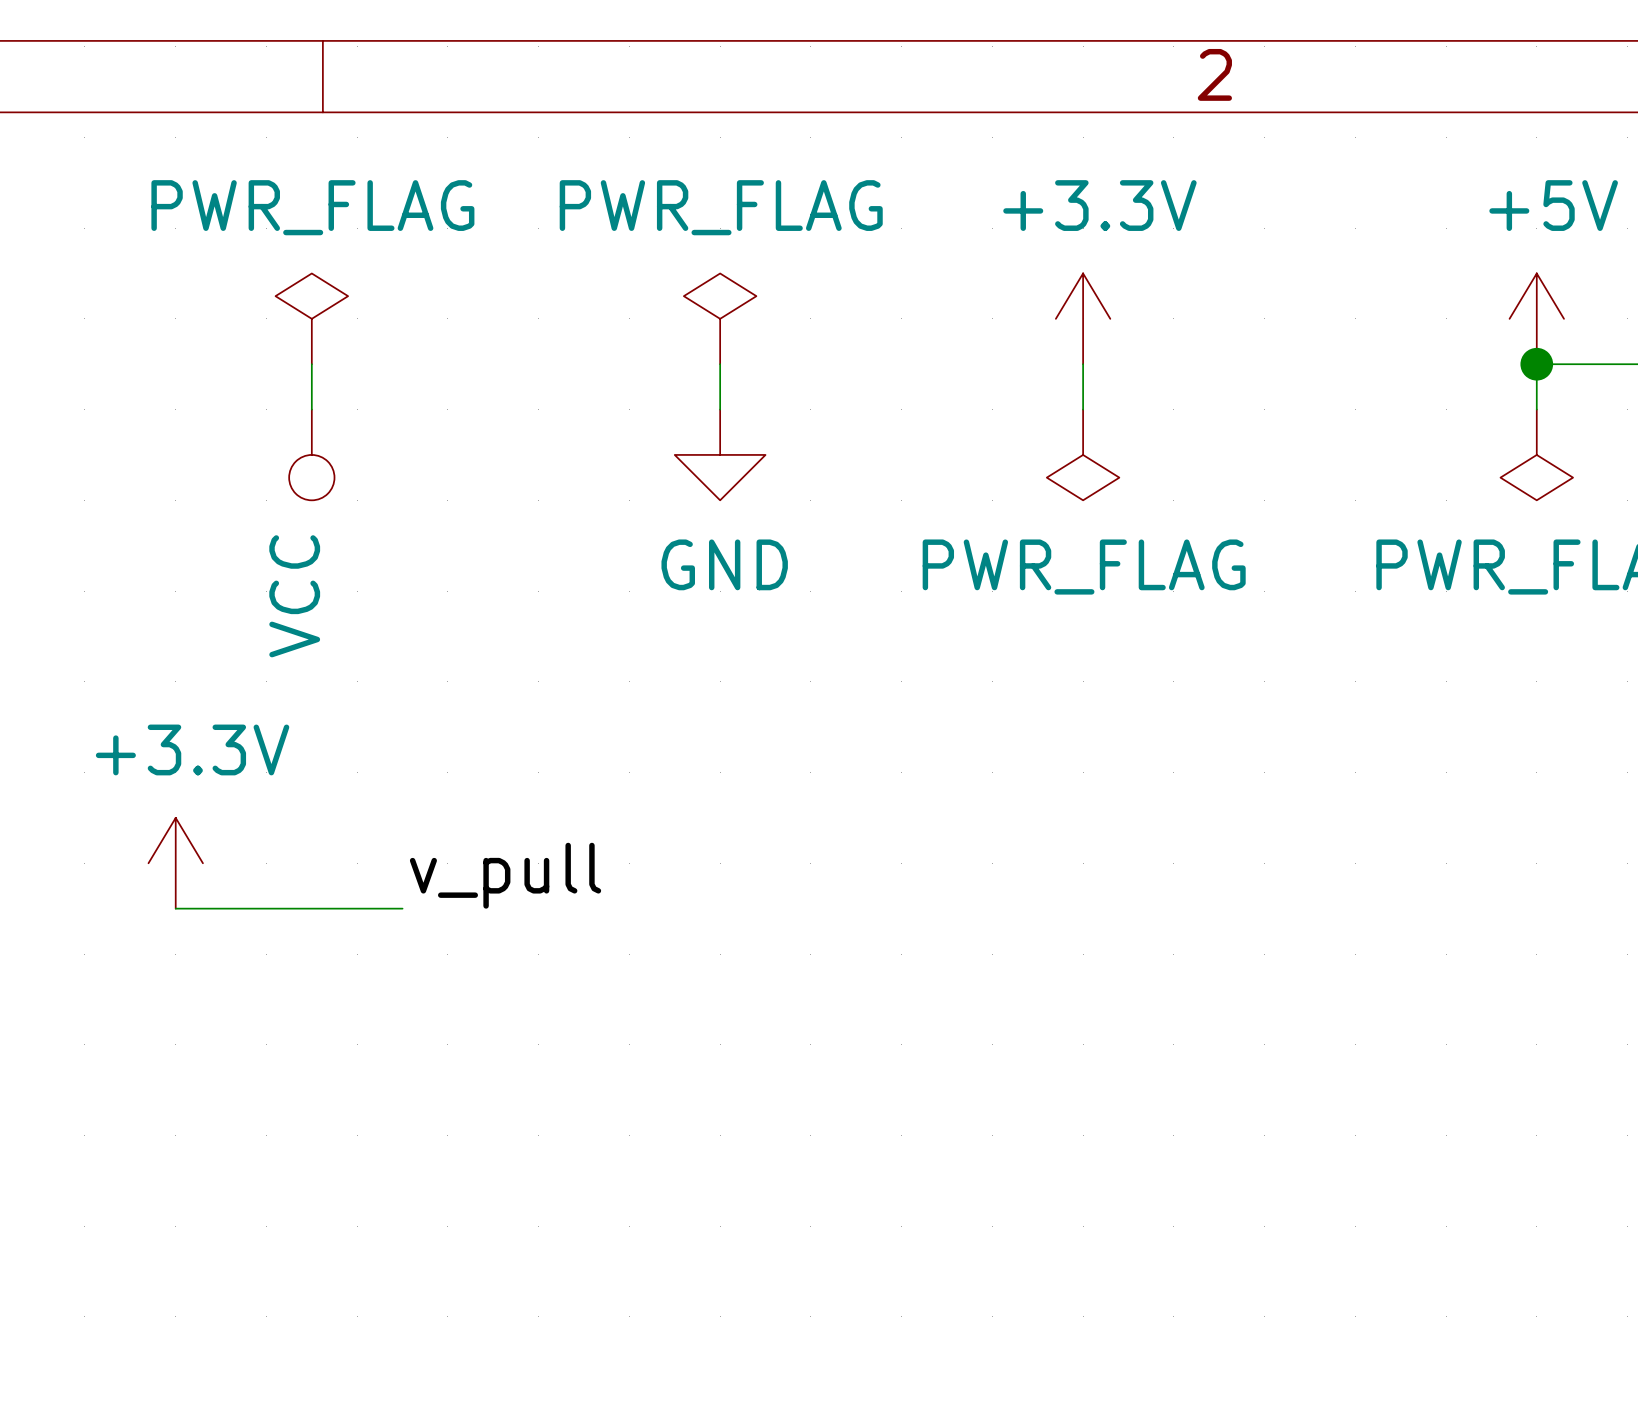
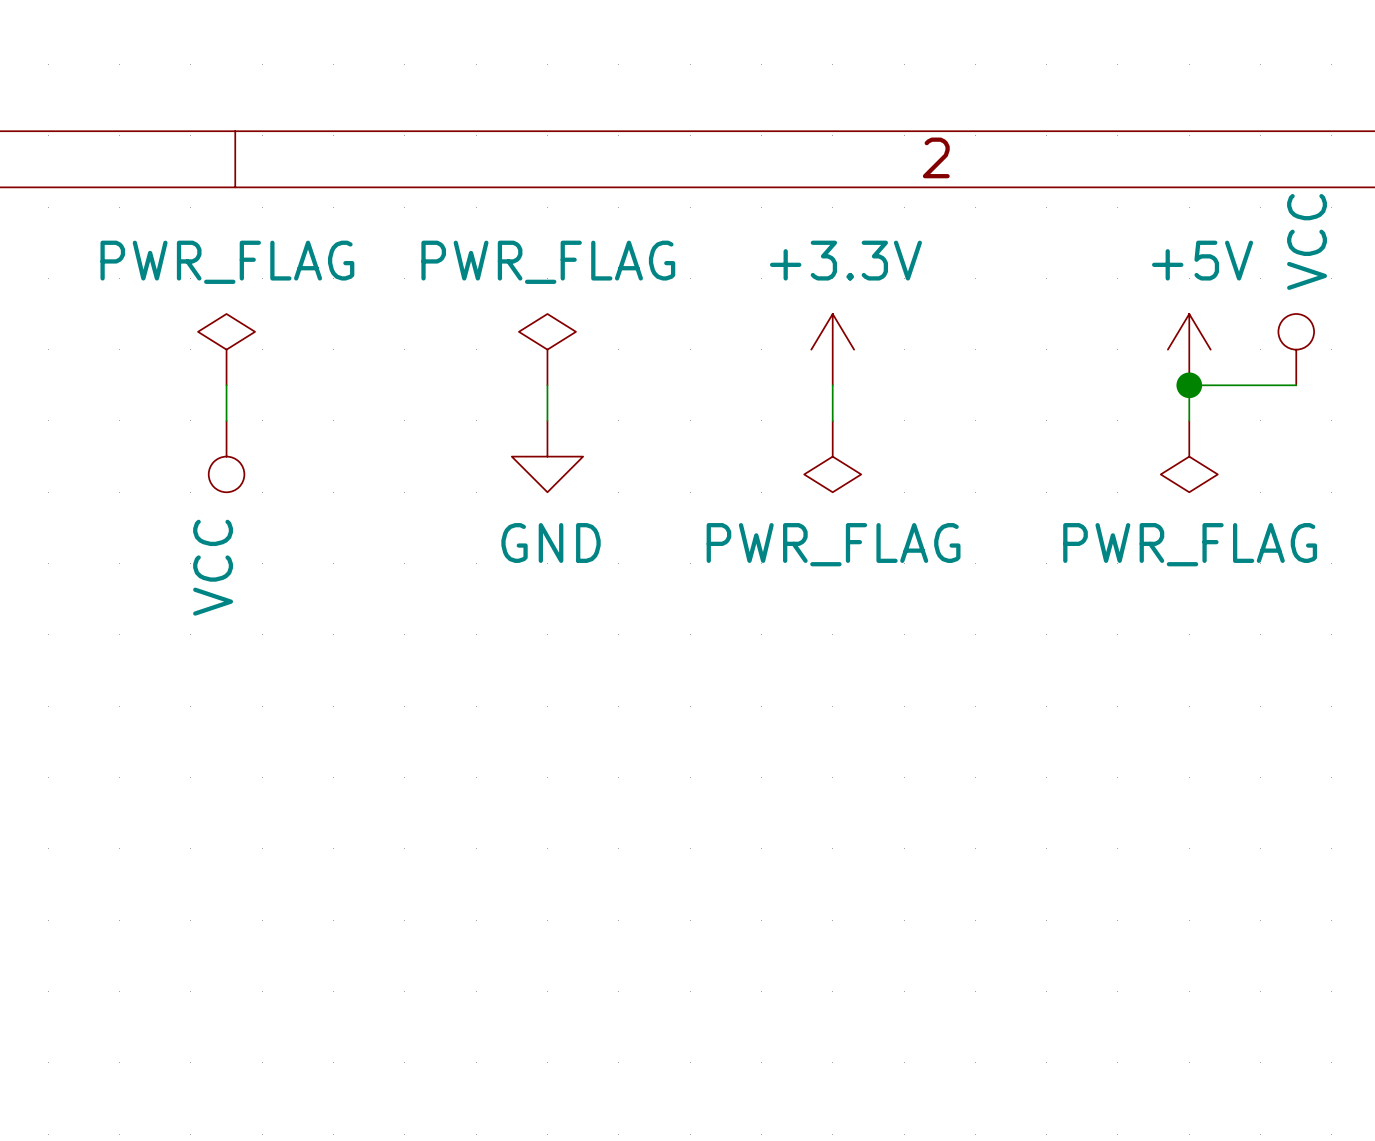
power symbol: +3.3V (175, 863) -> none
label: v_pull (505, 875) -> none
wire: (175, 908) (402, 908) -> none

